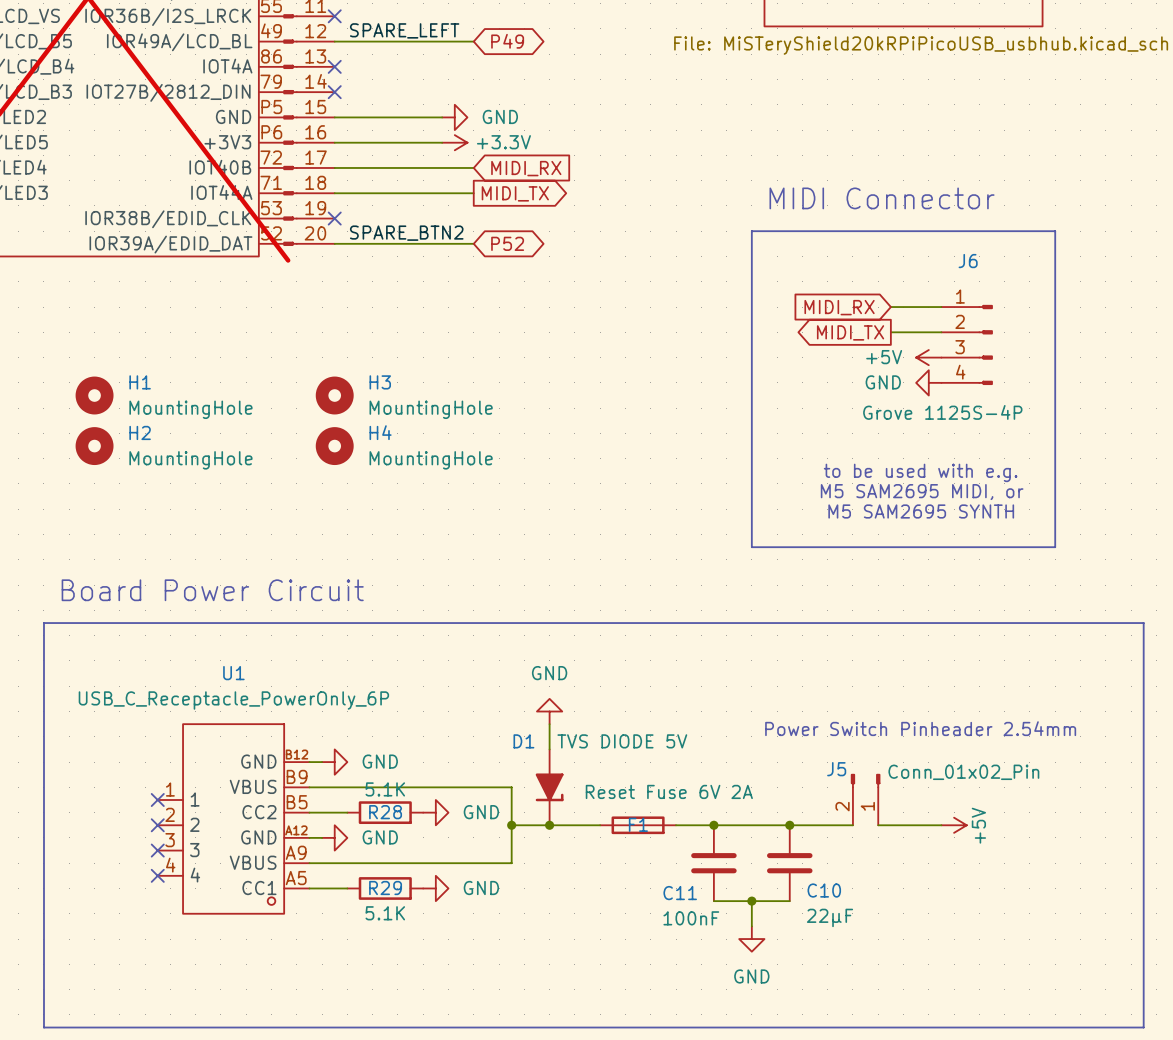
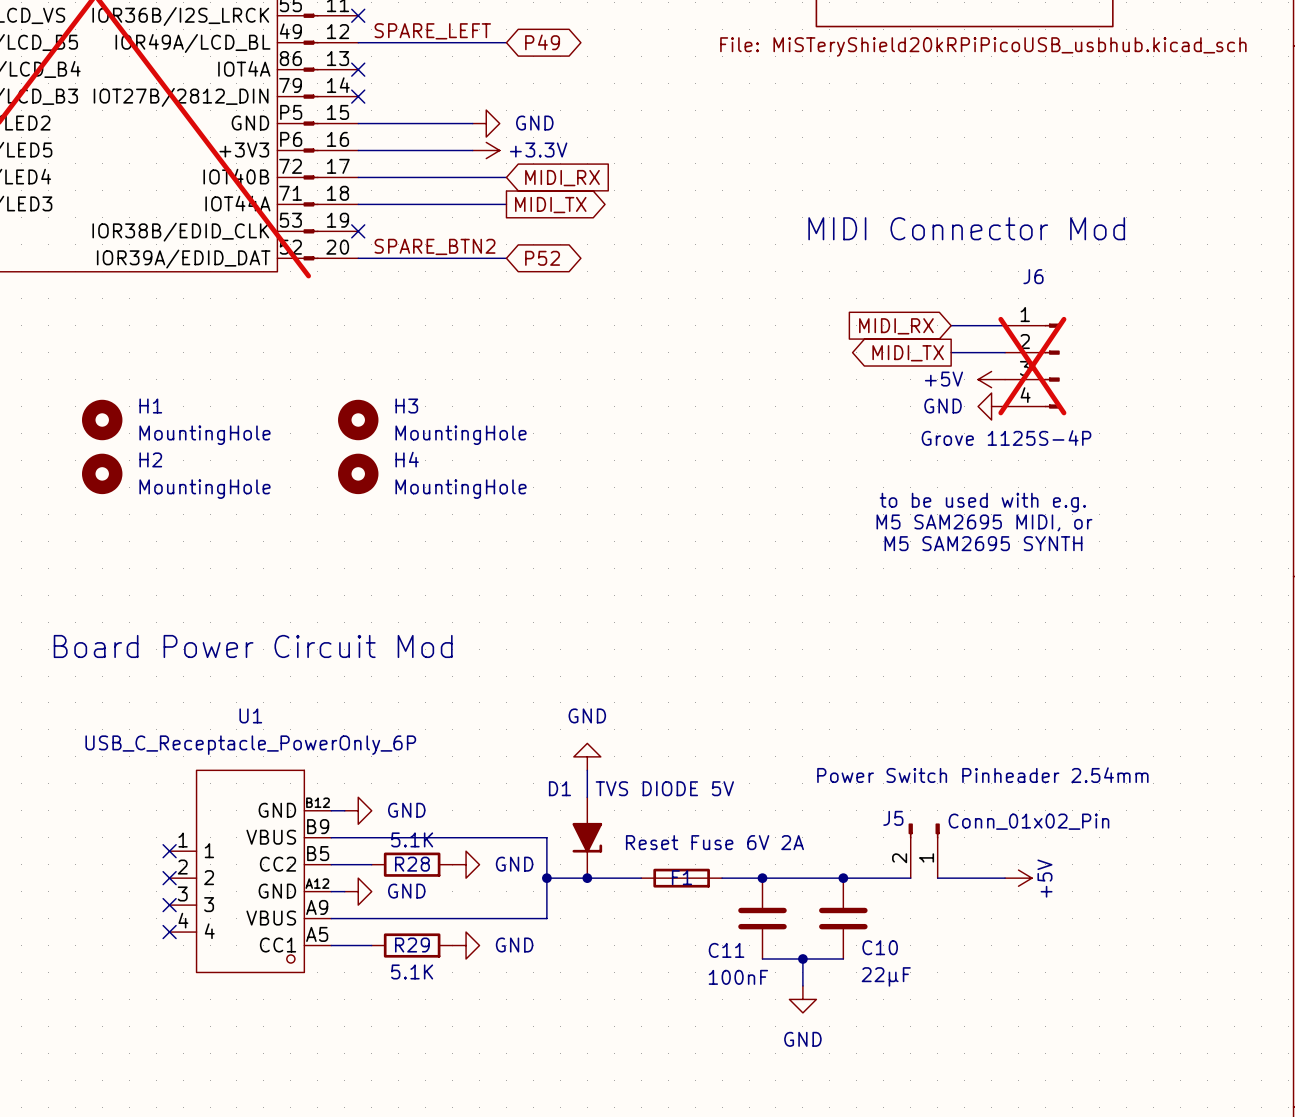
text: MIDI Connector (882, 198) -> MIDI Connector Mod (966, 228)
line: (751, 231) (1055, 231) (1055, 547) (751, 547) (751, 231) -> none
J6 do-not-place cross: none -> (1032, 366)
text: Board Power Circuit (212, 590) -> Board Power Circuit Mod (253, 646)
line: (43, 623) (1143, 623) (1143, 1027) (43, 1027) (43, 623) -> none

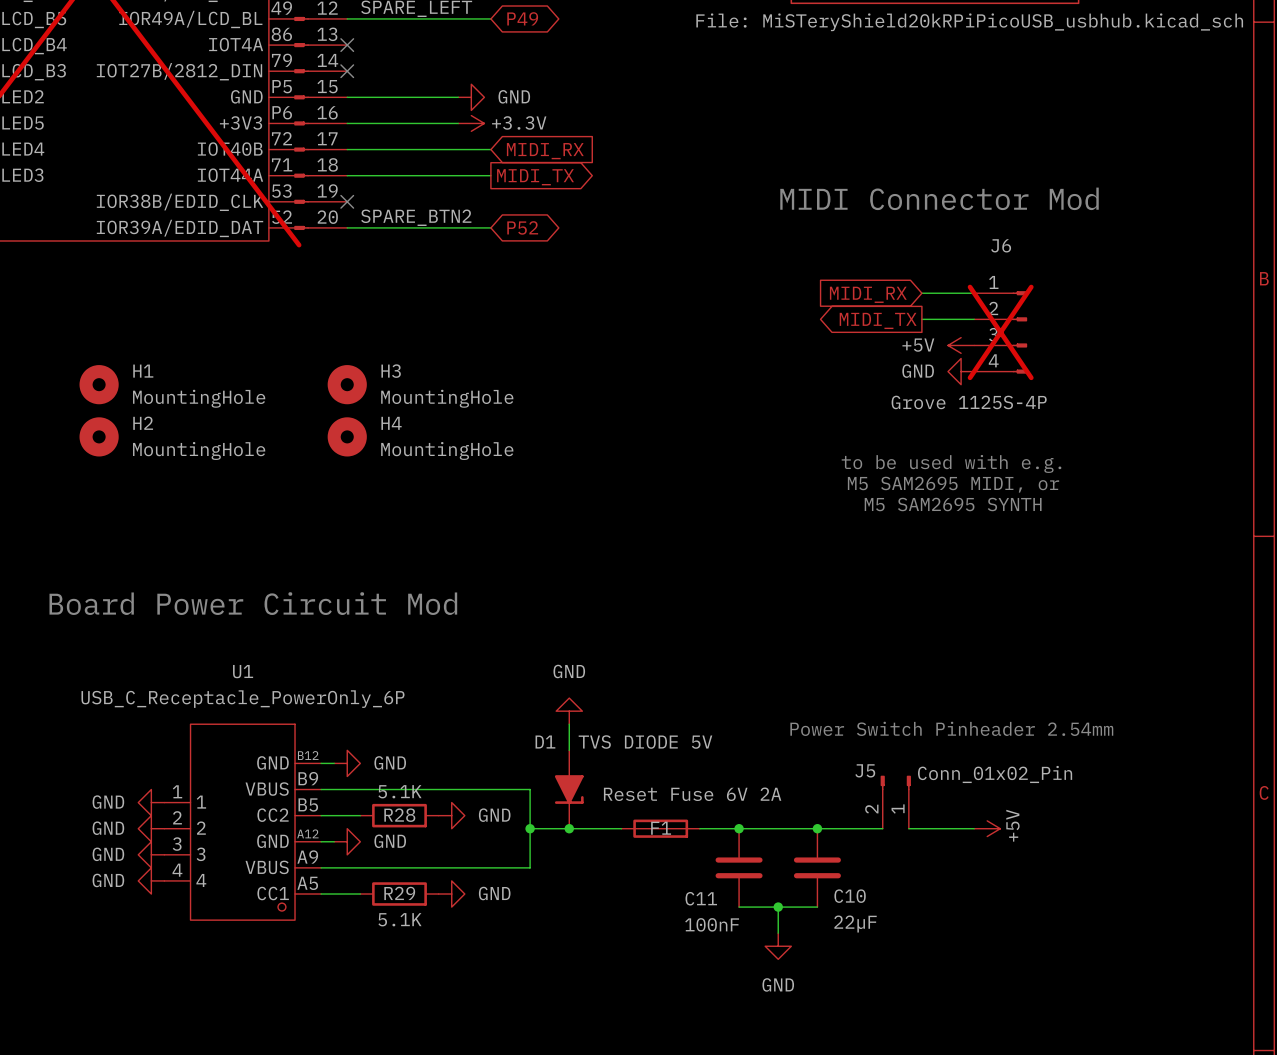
power symbol: none -> GND (151, 802)
no-connect mark: (169, 851) -> none
power symbol: none -> GND (151, 828)
no-connect mark: (169, 878) -> none
power symbol: none -> GND (151, 854)
no-connect mark: (169, 905) -> none
power symbol: none -> GND (151, 880)
no-connect mark: (169, 932) -> none

